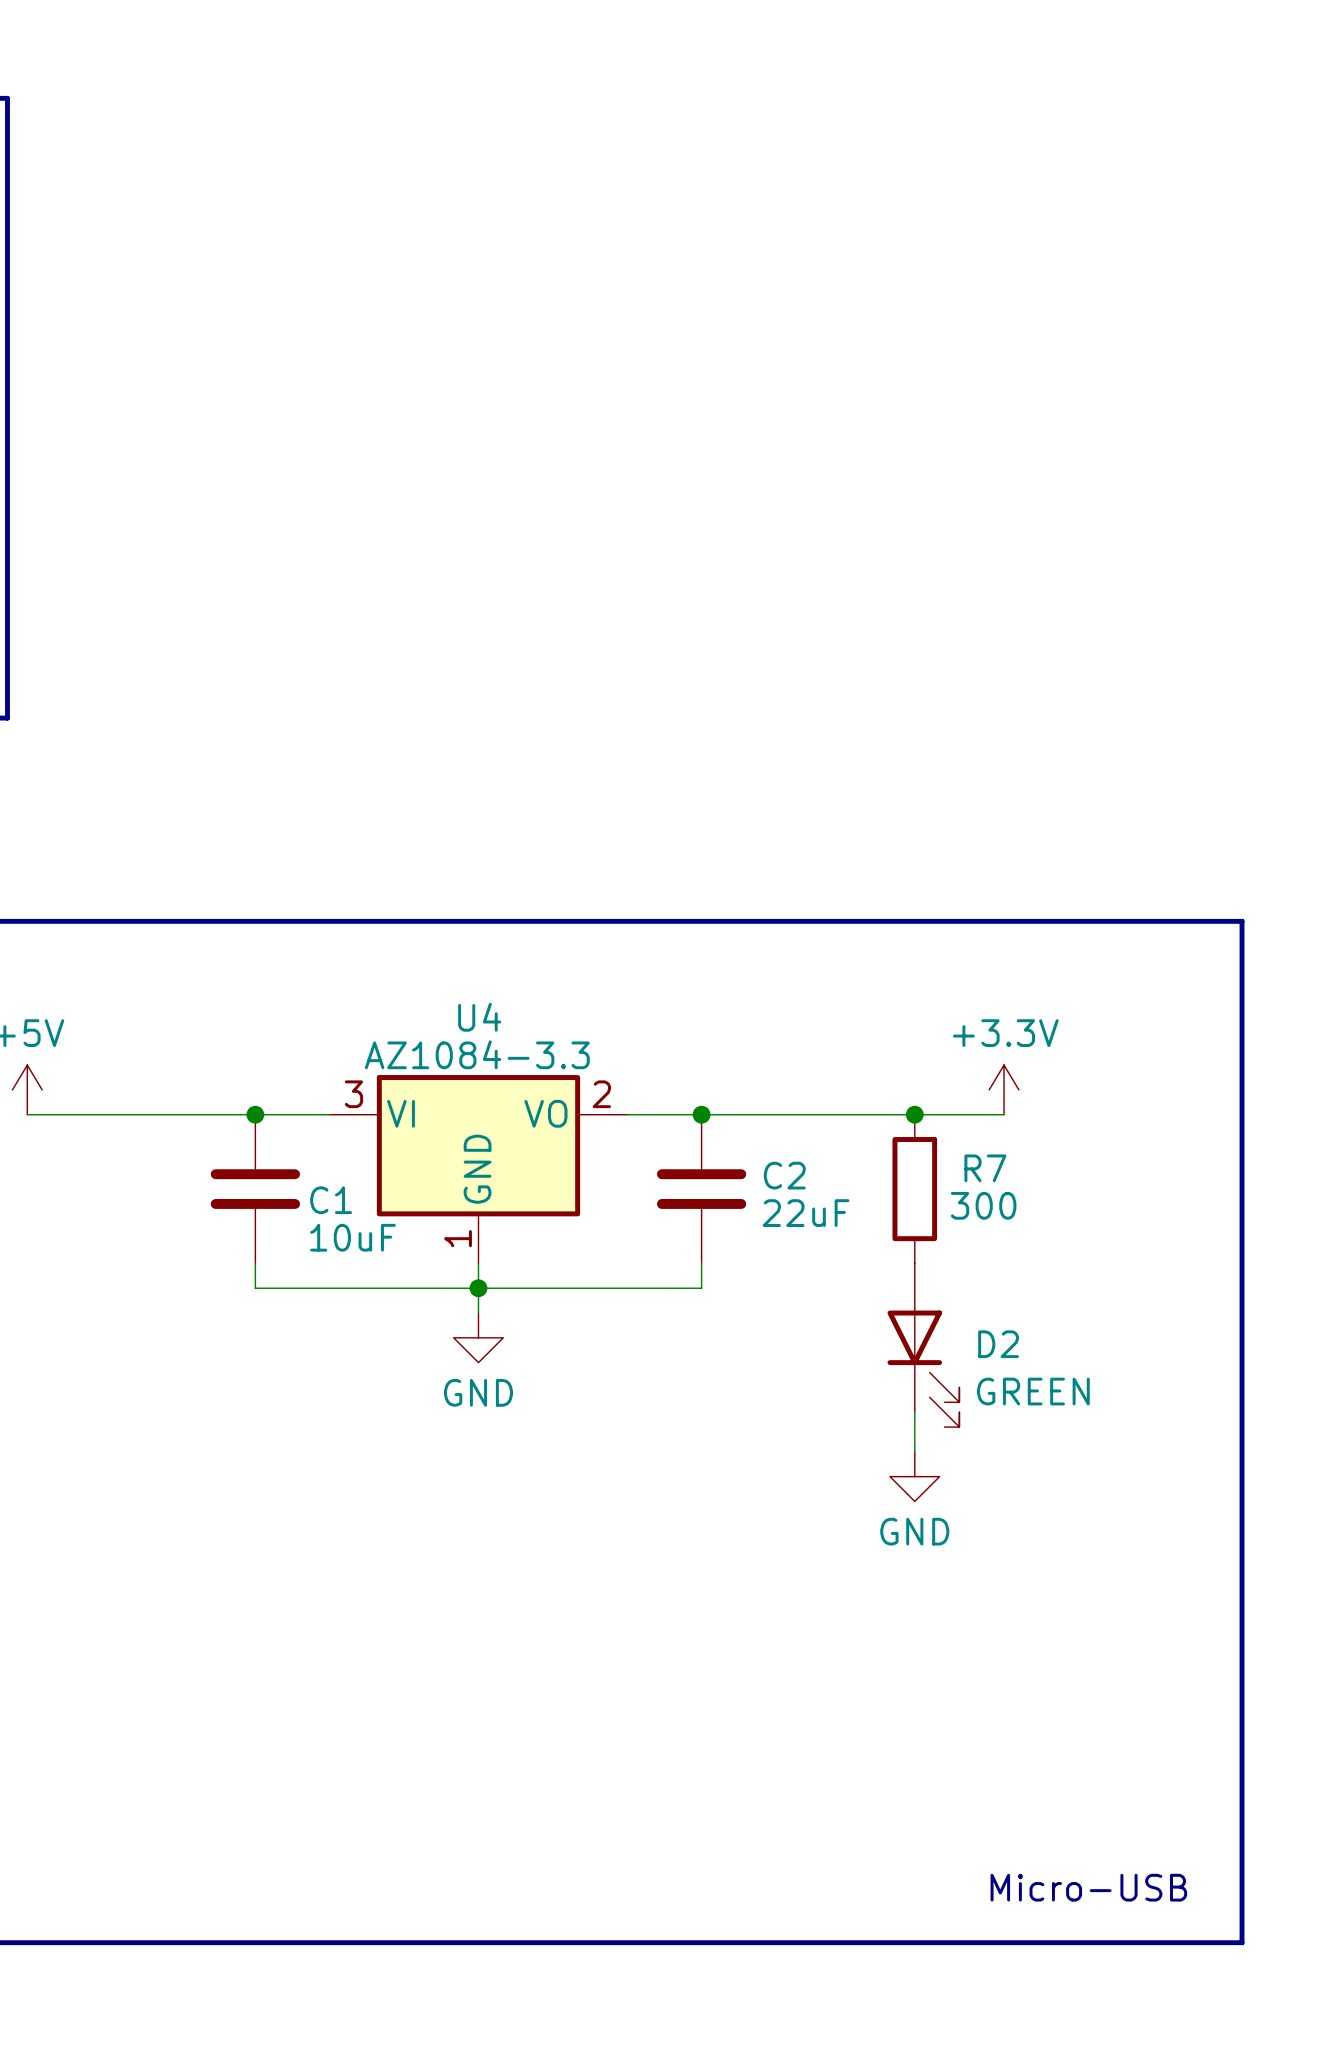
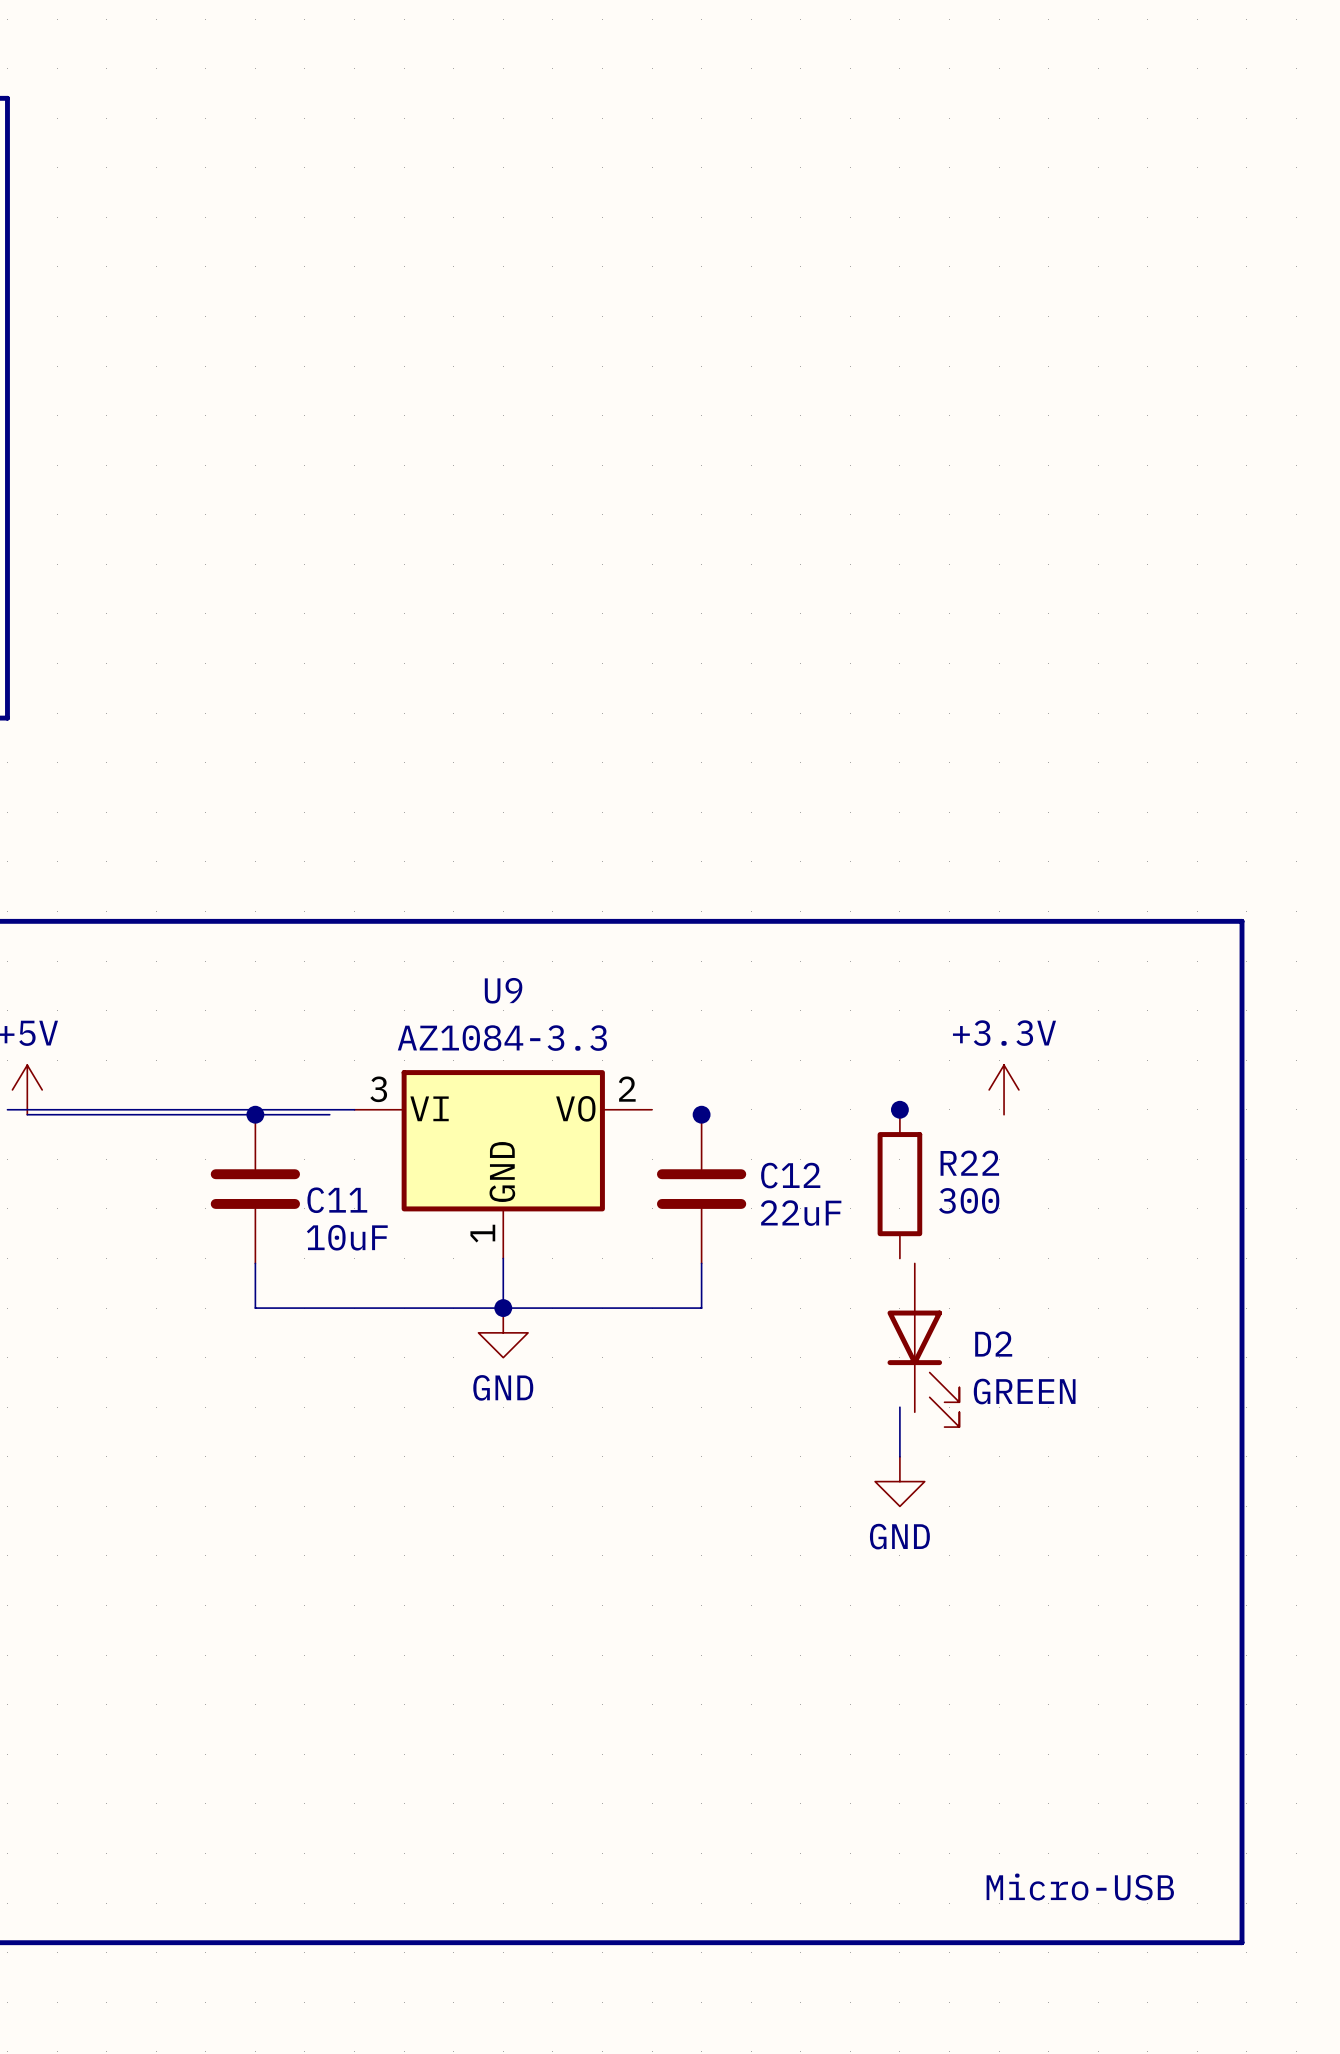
wire: none -> (7, 1109) (354, 1109)
wire: (627, 1114) (1004, 1114) -> none
junction position: (914, 1114) -> (899, 1109)
U9: none -> AZ1084-3.3 (503, 1164)
R7 name: R7 (985, 1168) -> R22 (969, 1163)
U4: AZ1084-3.3 (478, 1169) -> none
C2 name: C2 (784, 1175) -> C12 (790, 1175)
R7 position: (914, 1189) -> (899, 1184)
C1 name: C1 (331, 1200) -> C11 (337, 1200)
wire: (478, 1263) (478, 1313) -> (503, 1258) (503, 1308)
wire: (255, 1288) (701, 1288) -> (255, 1288) (255, 1308) (701, 1308) (701, 1288)
junction position: (478, 1288) -> (503, 1308)
power symbol position: GND (478, 1337) -> GND (503, 1332)
wire: none -> (899, 1407) (899, 1456)
wire: (914, 1412) (914, 1451) -> none
power symbol position: GND (914, 1476) -> GND (899, 1481)

